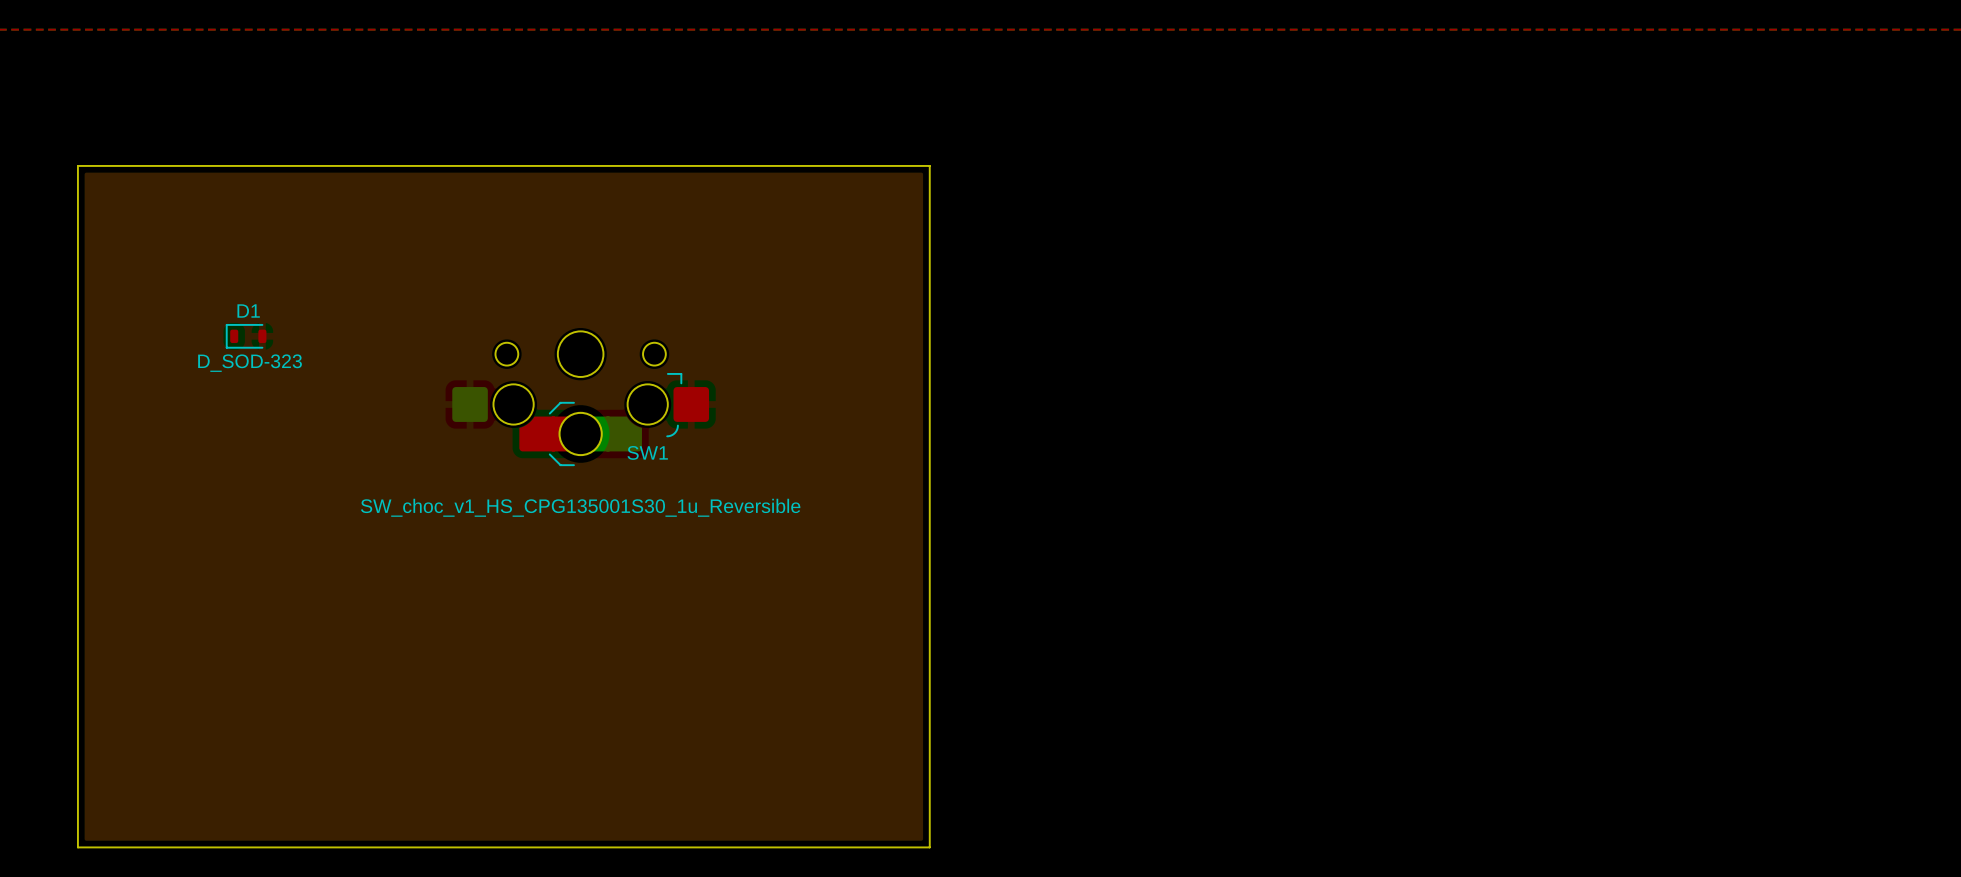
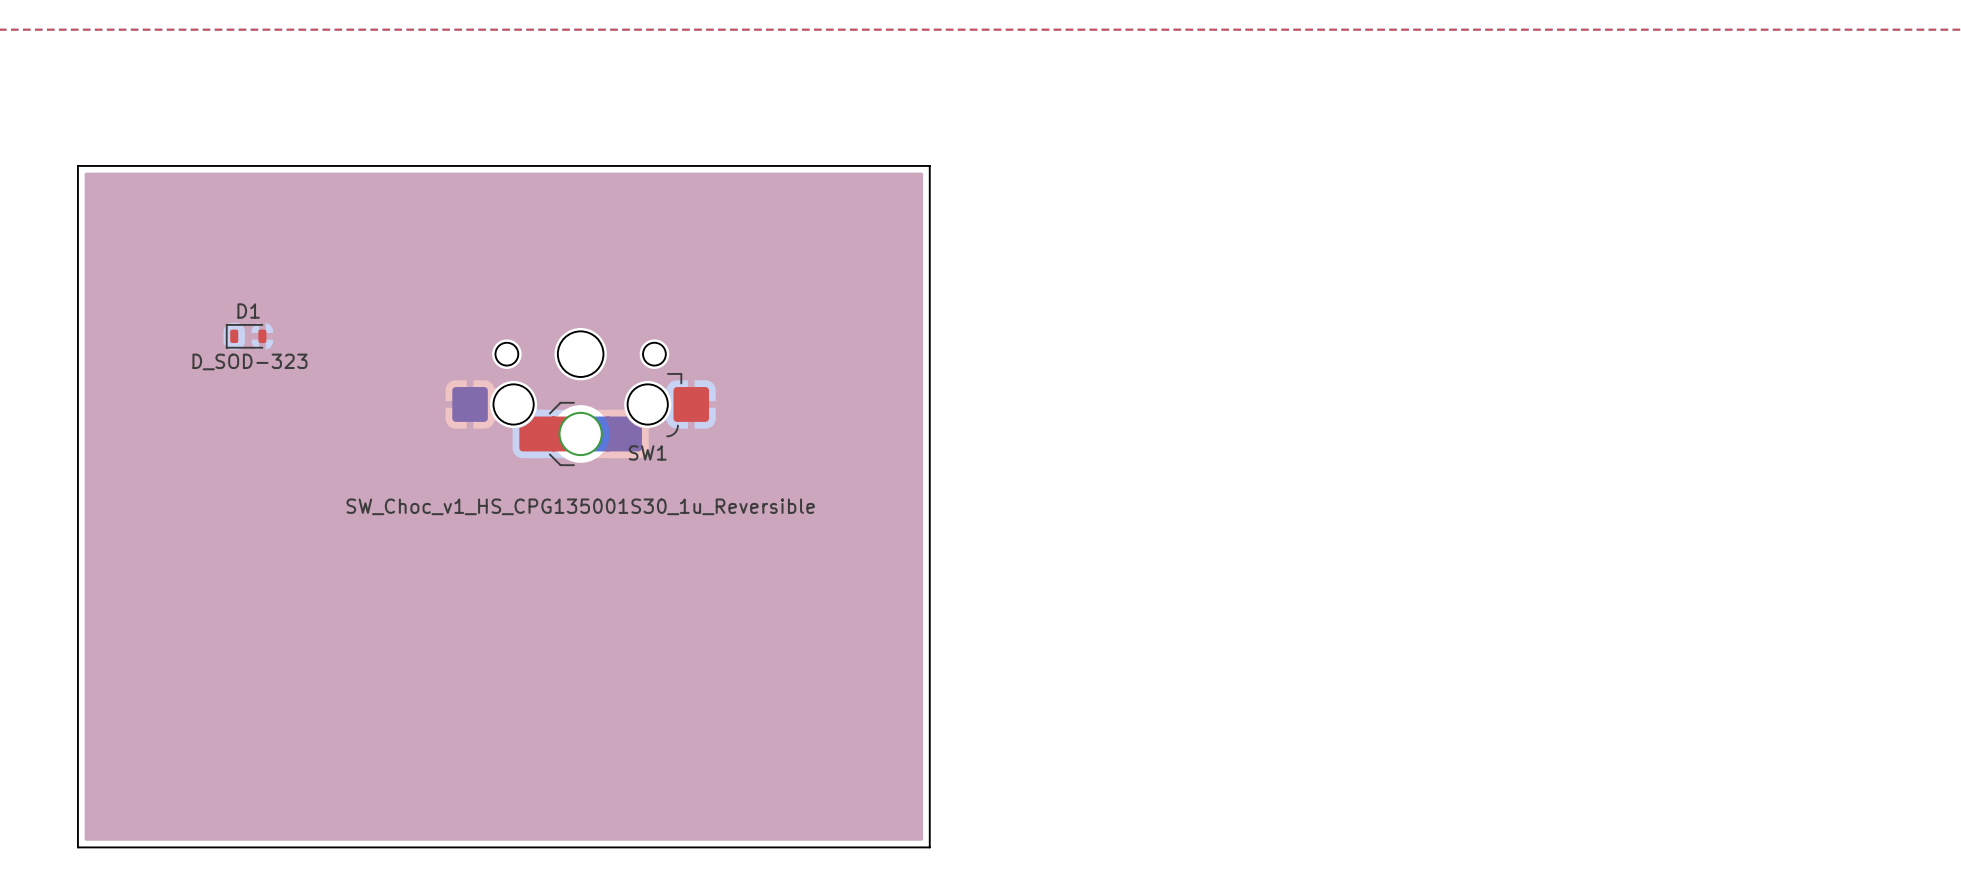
SW1 value: SW_choc_v1_HS_CPG135001S30_1u_Reversible (580, 507) -> SW_Choc_v1_HS_CPG135001S30_1u_Reversible (580, 506)

